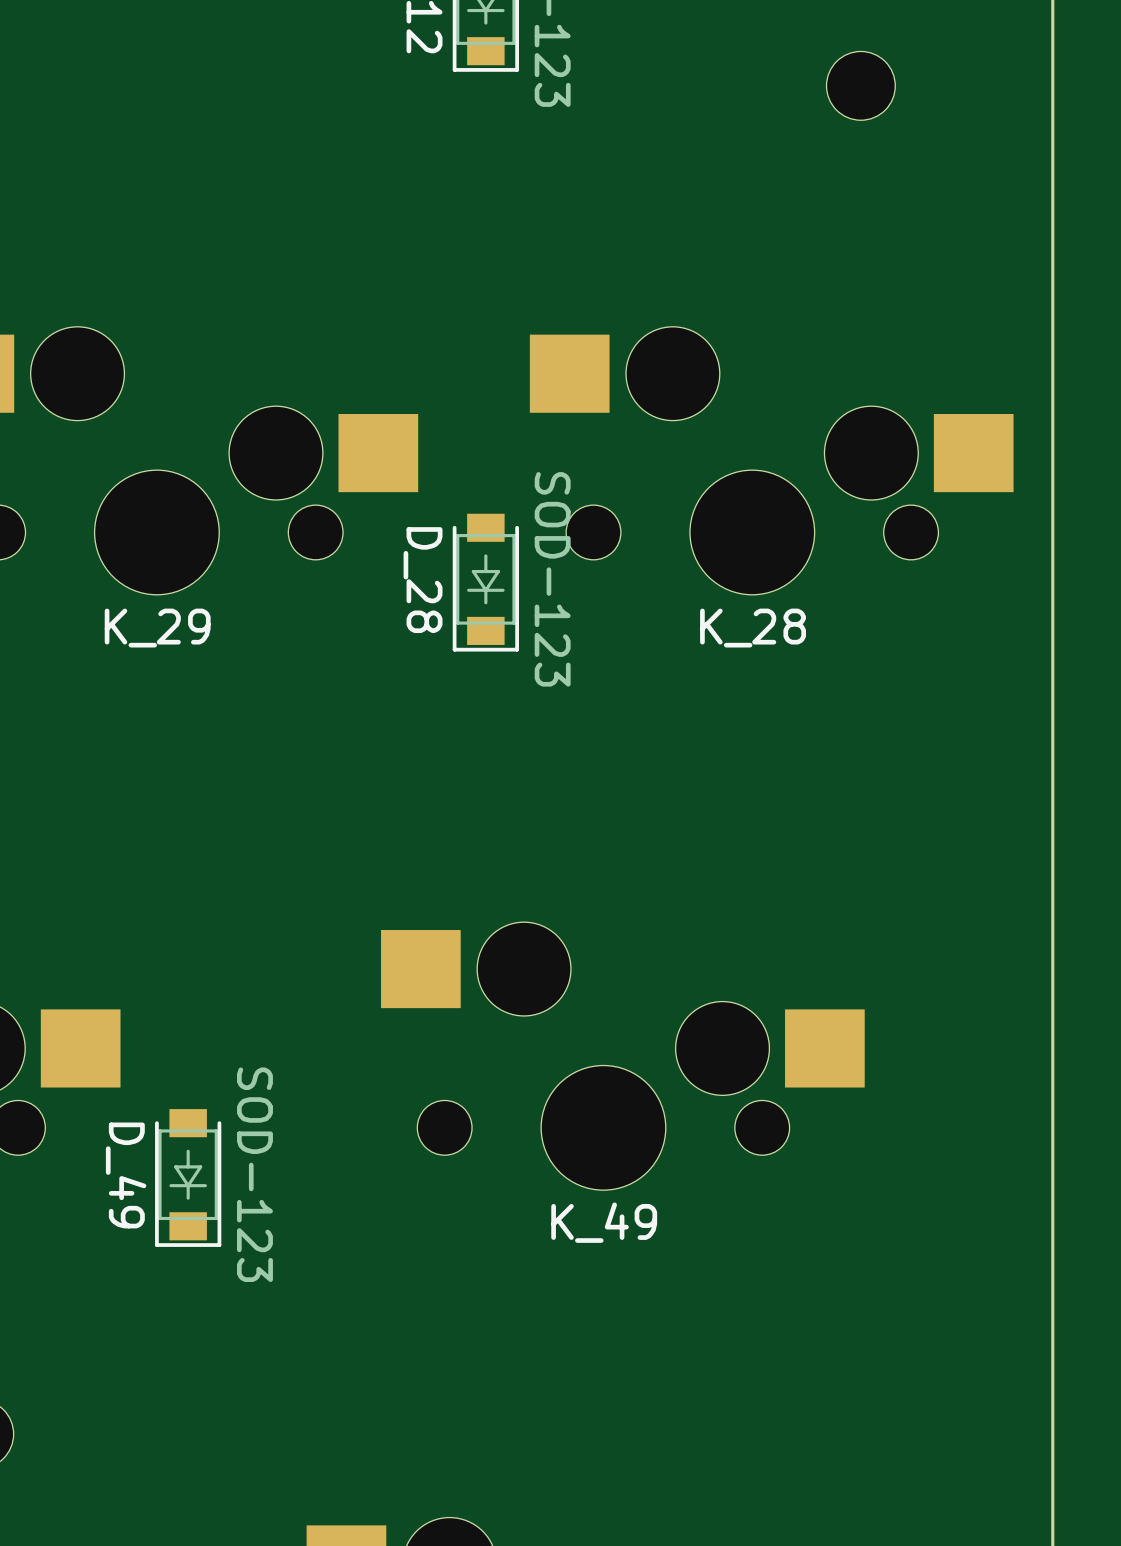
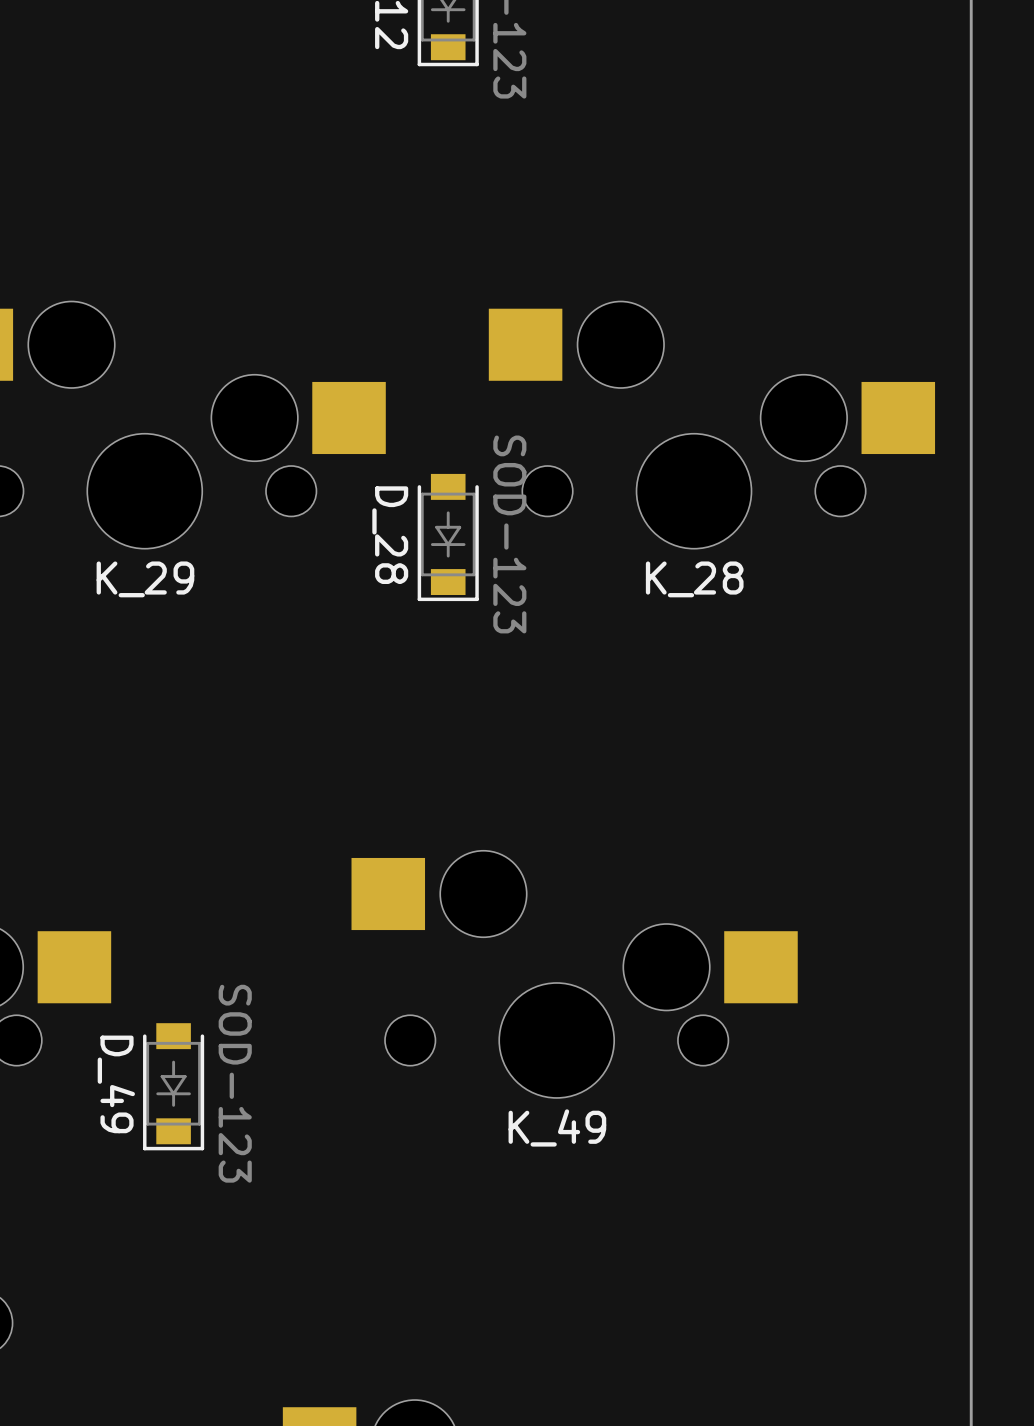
part: (860, 85) -> none

